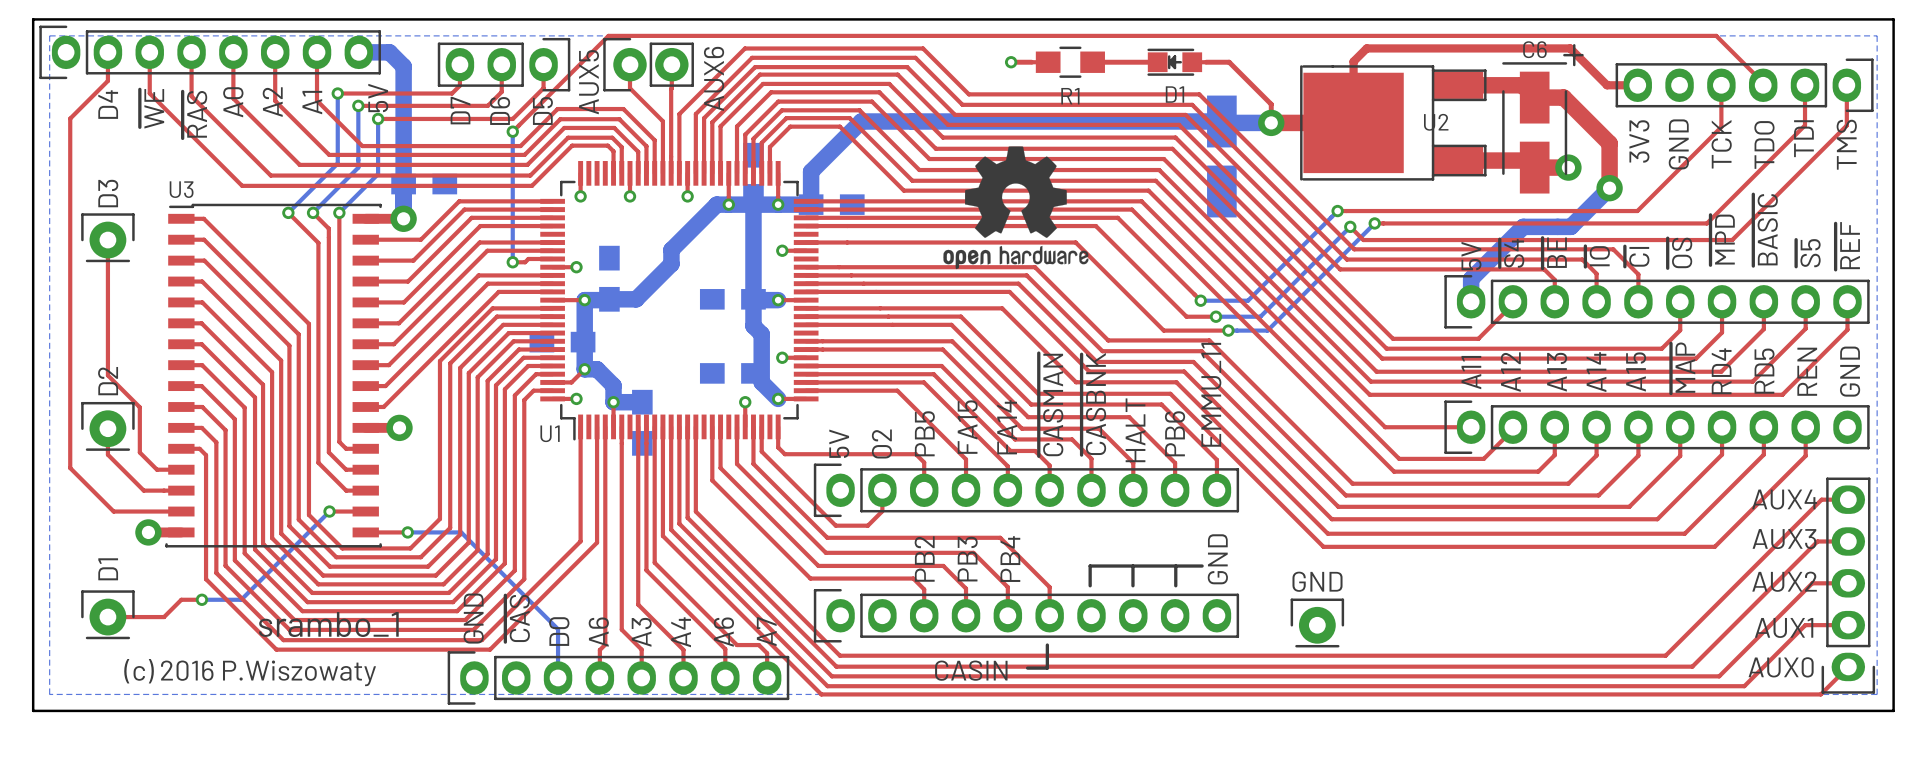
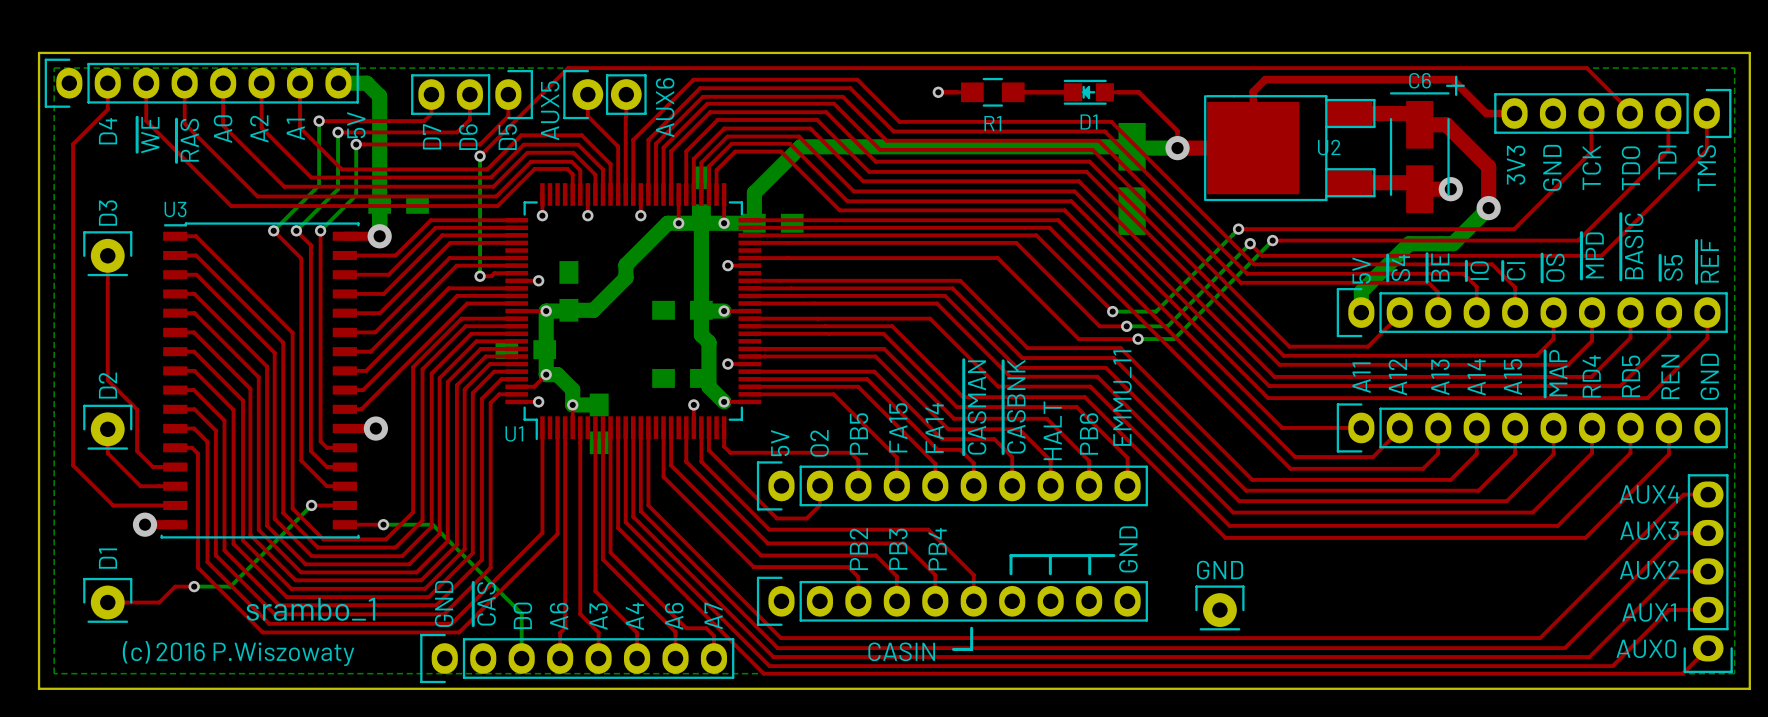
drawing: [943, 146, 1089, 270] -> none

